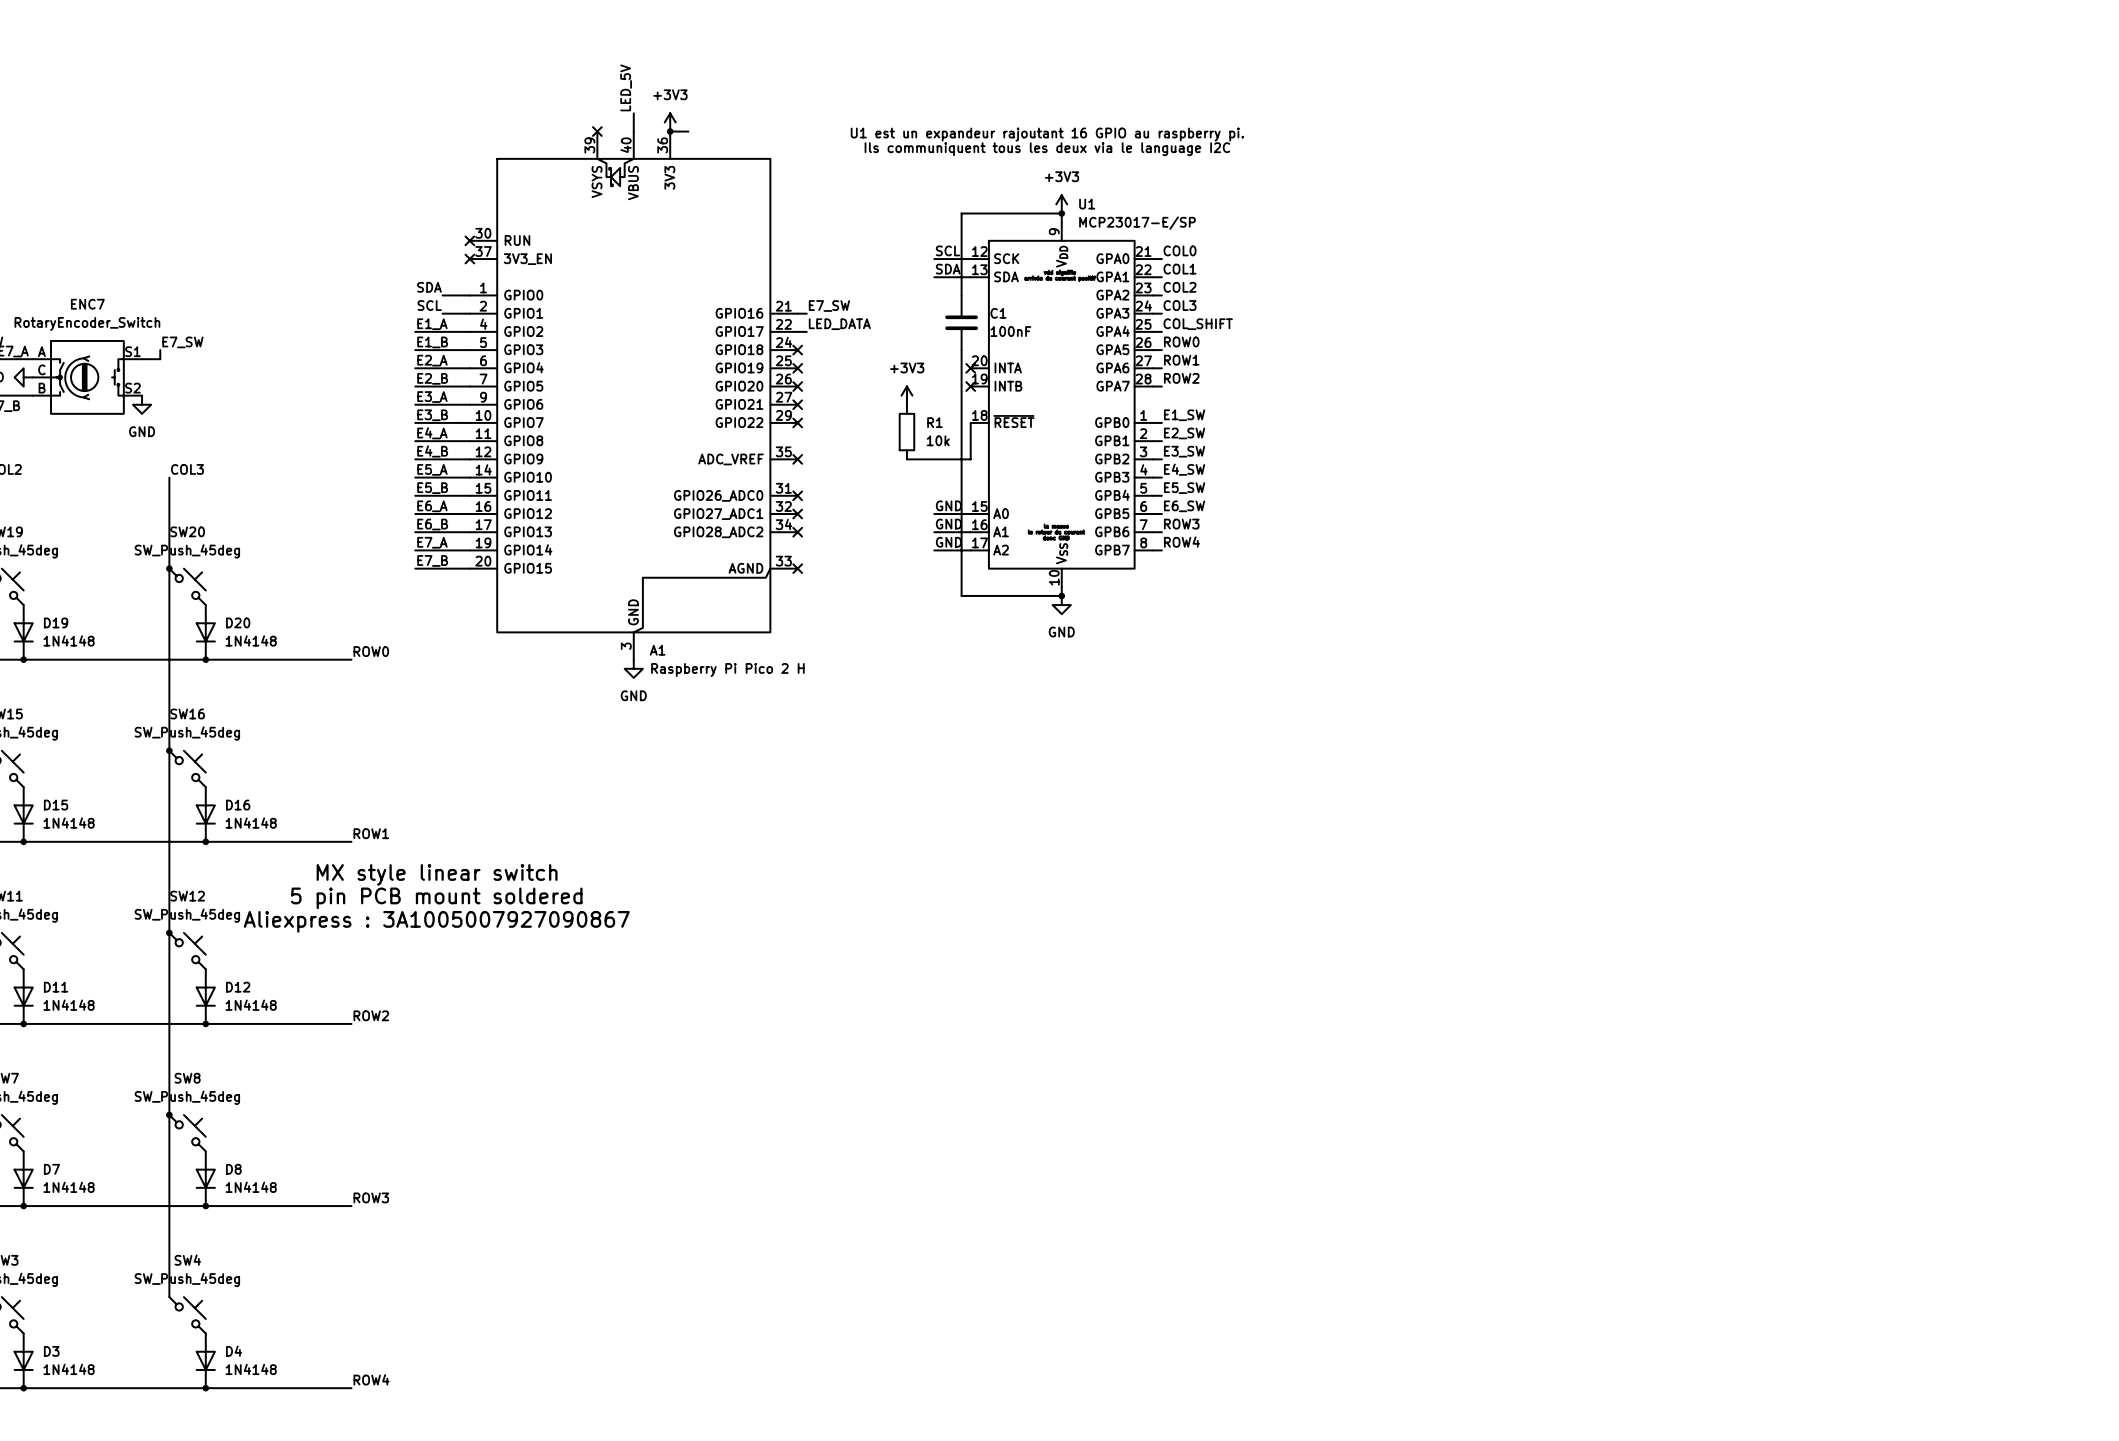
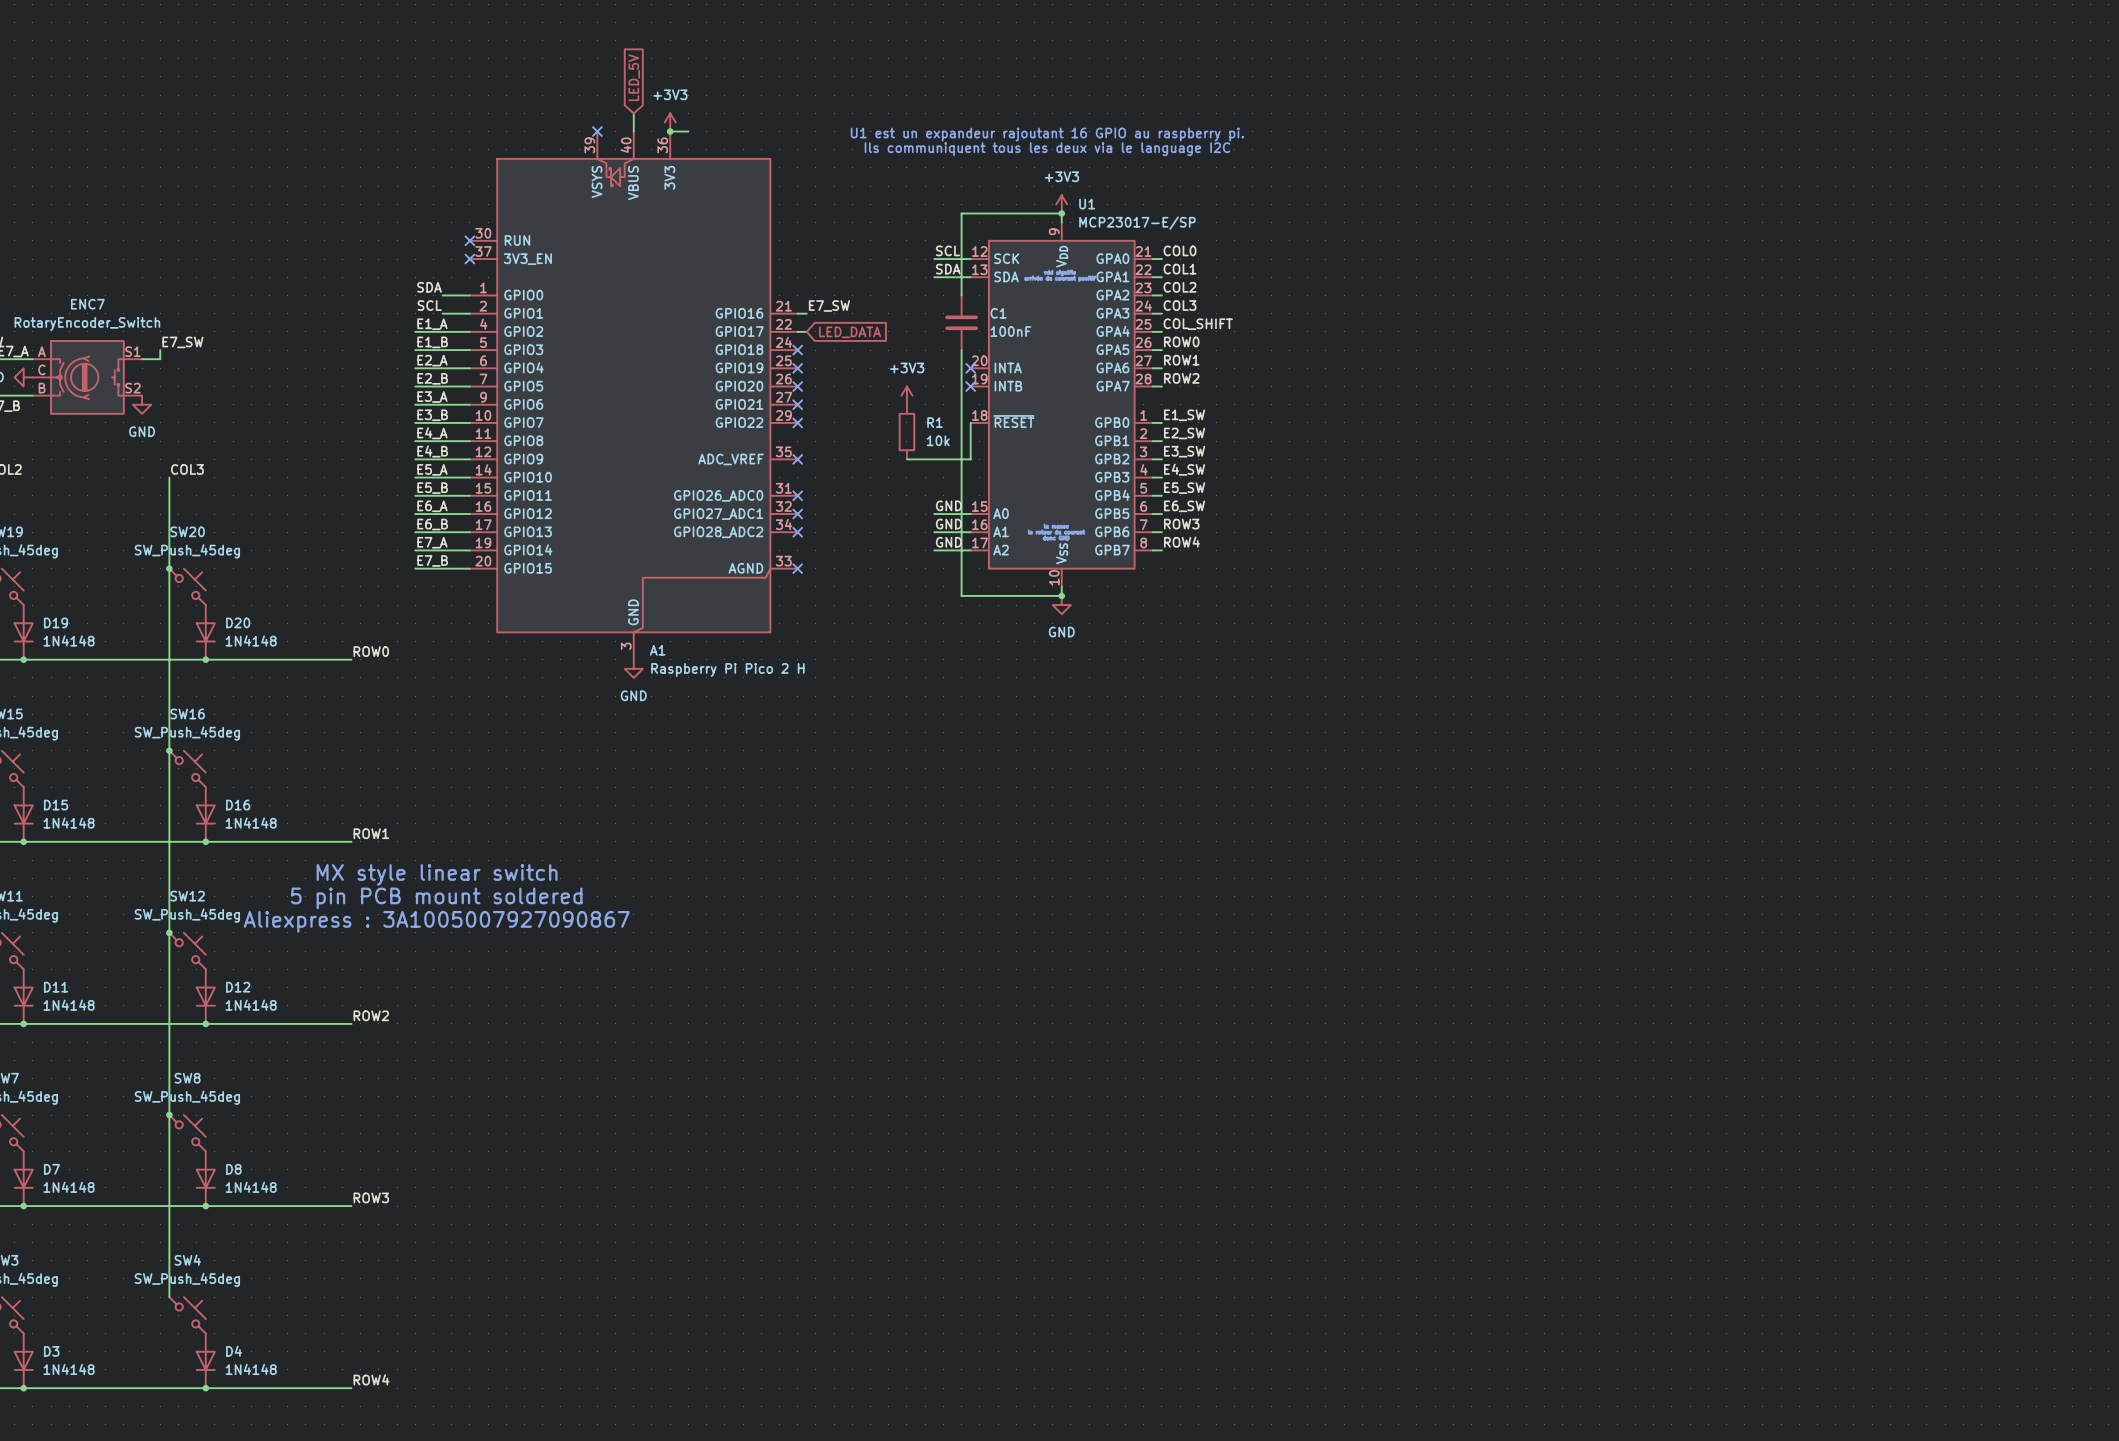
global label: none -> LED_5V (634, 77)
label: LED_5V (626, 87) -> none
label: LED_DATA (839, 324) -> none
global label: none -> LED_DATA (850, 332)

